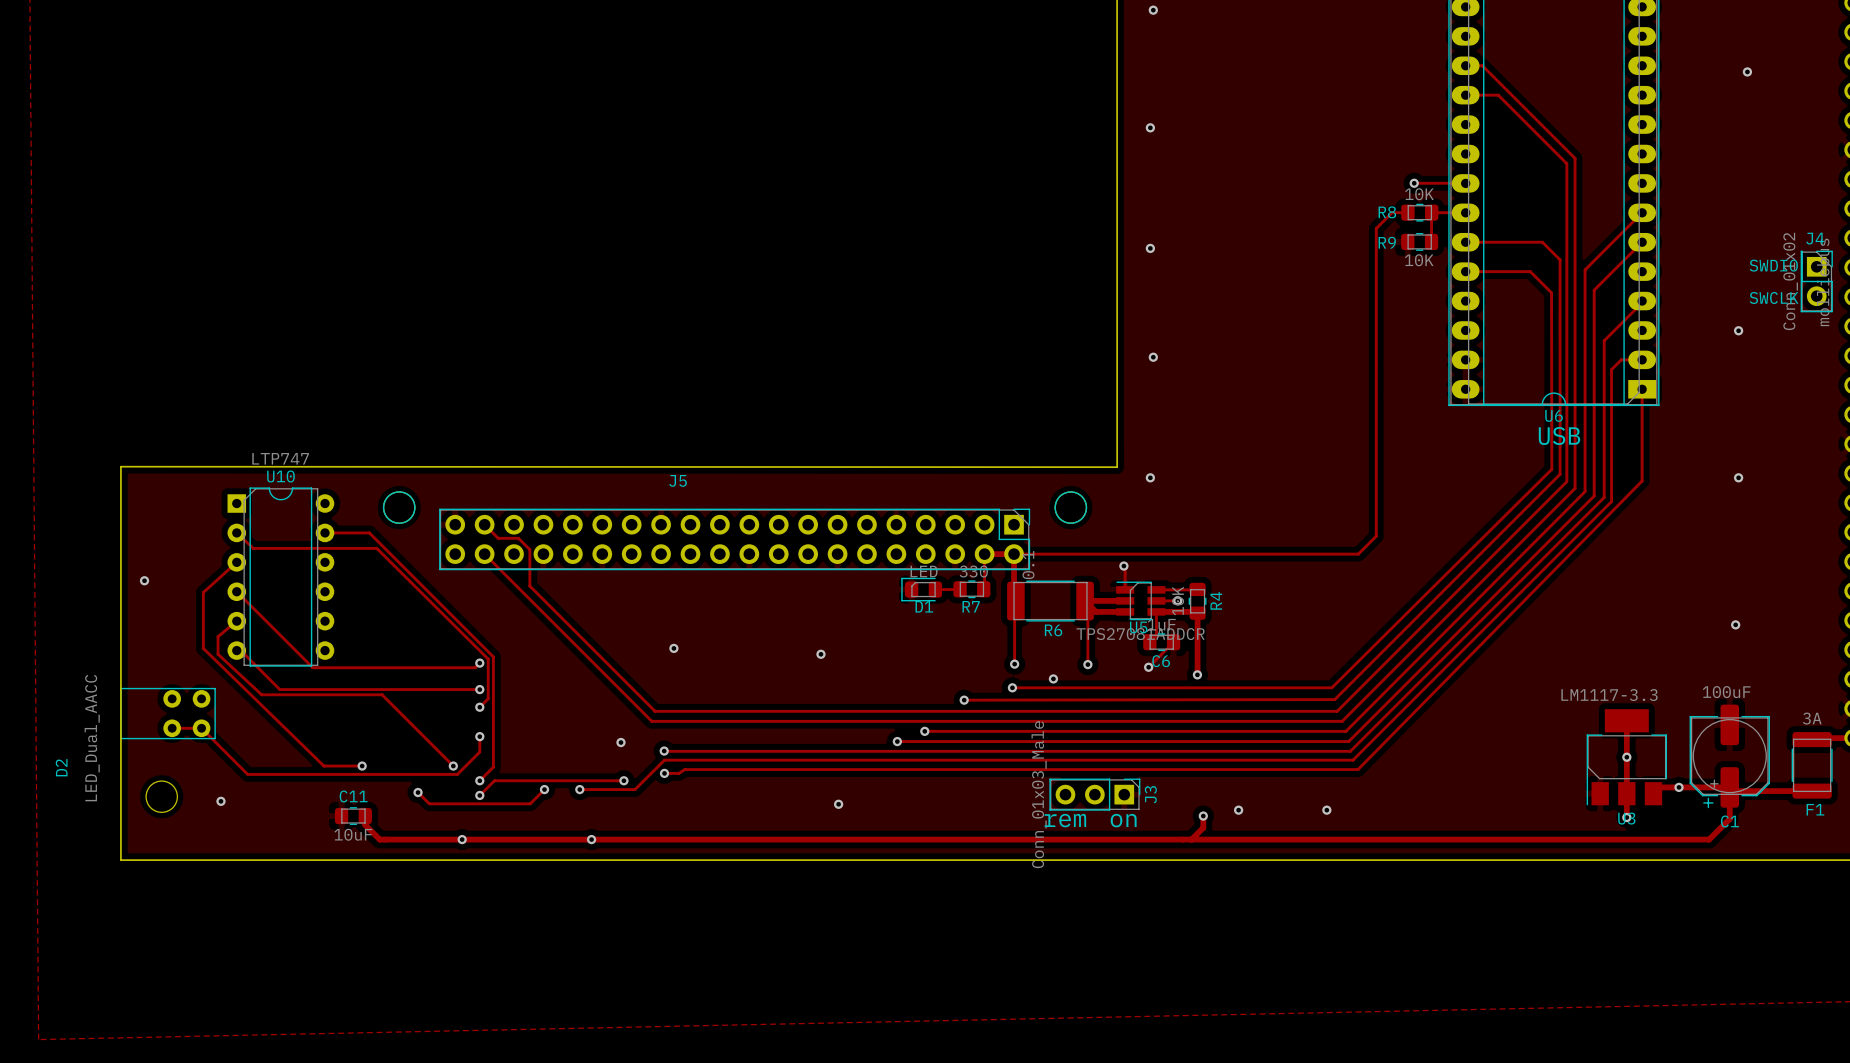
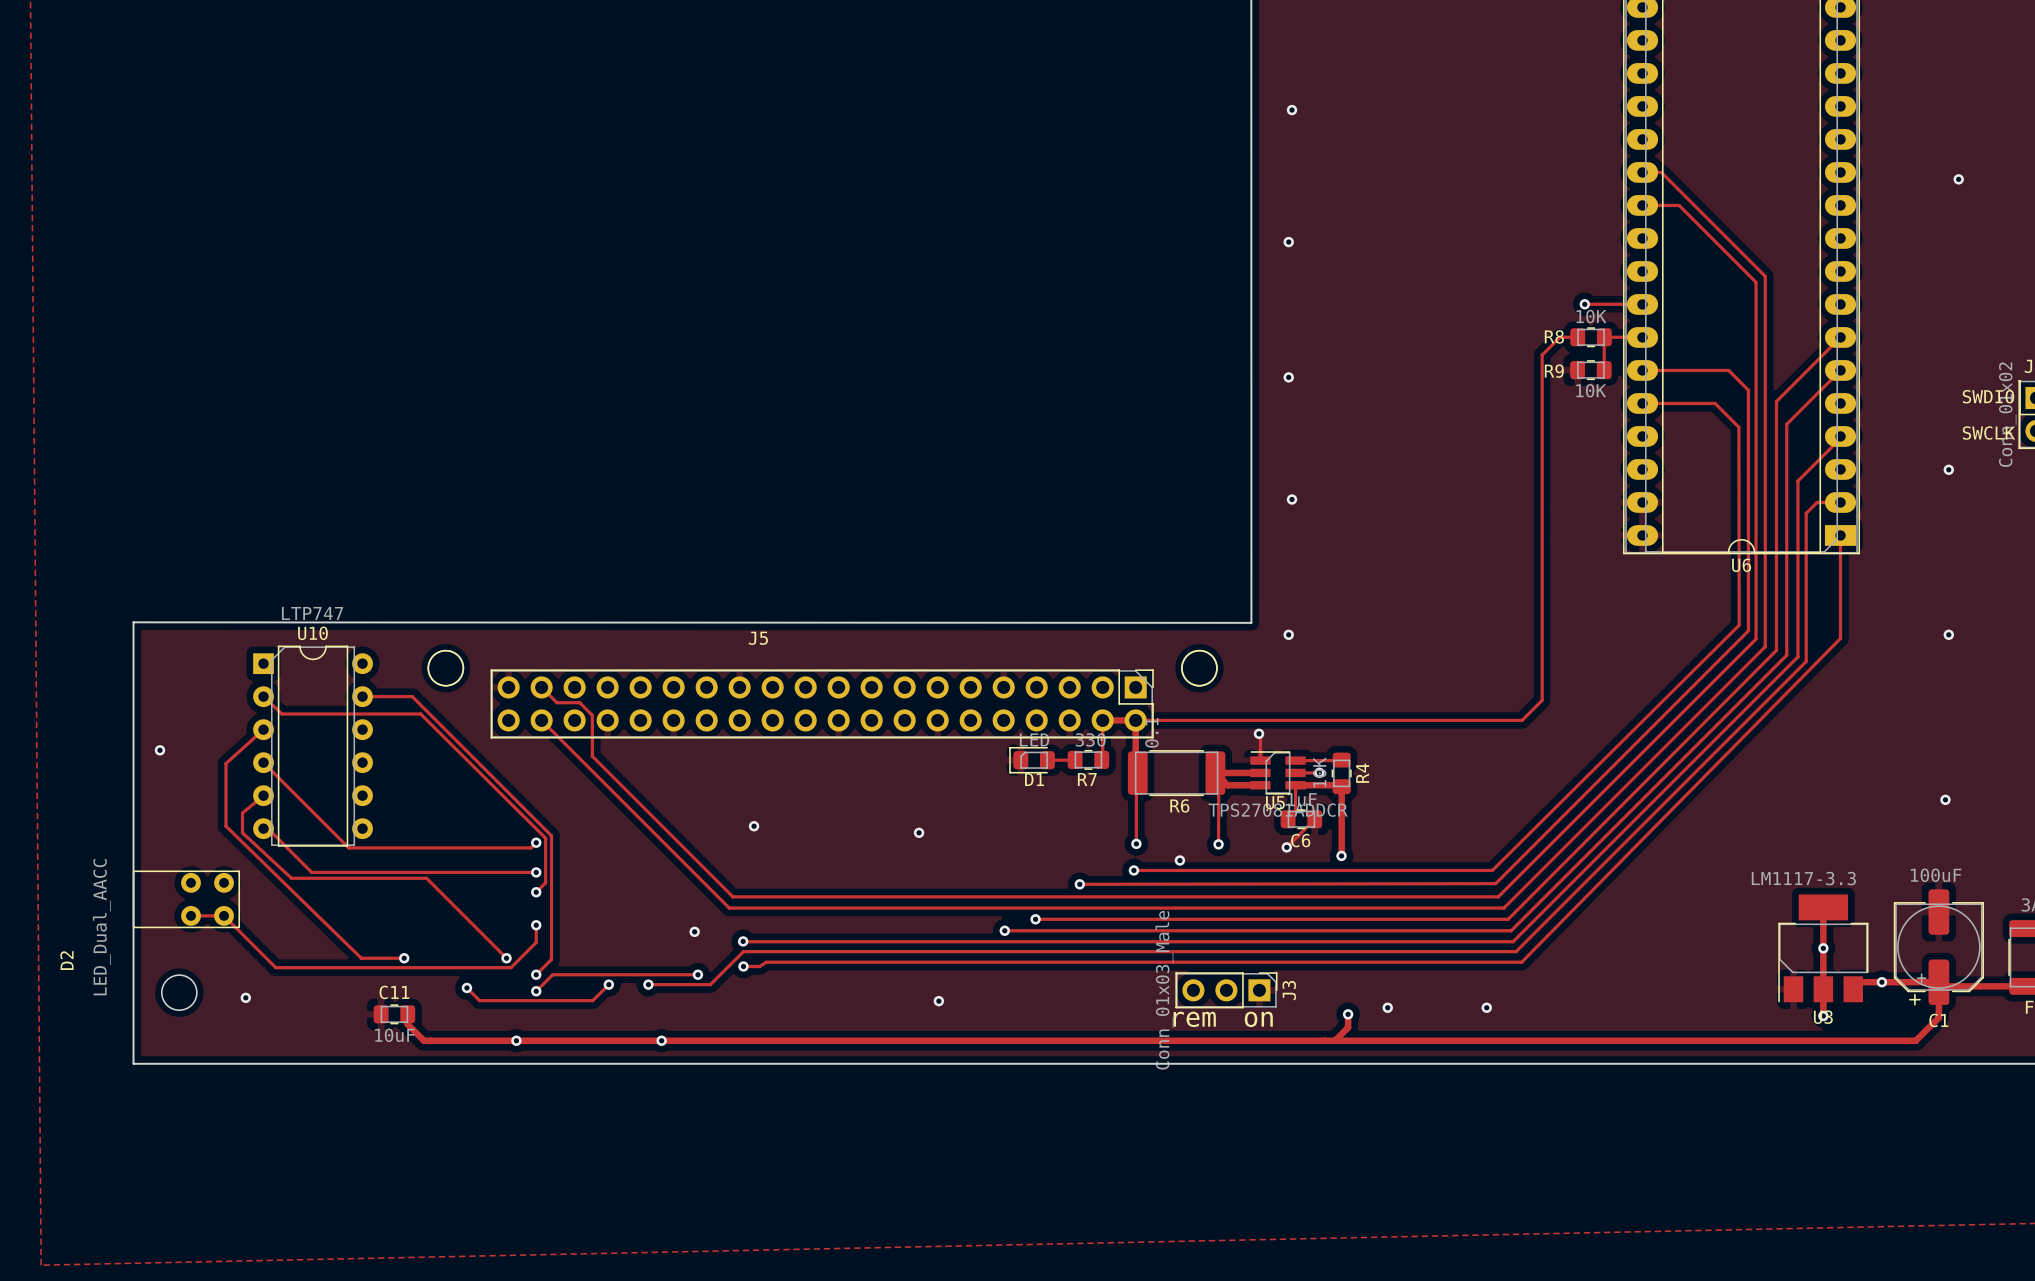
text: USB (1559, 435) -> none

